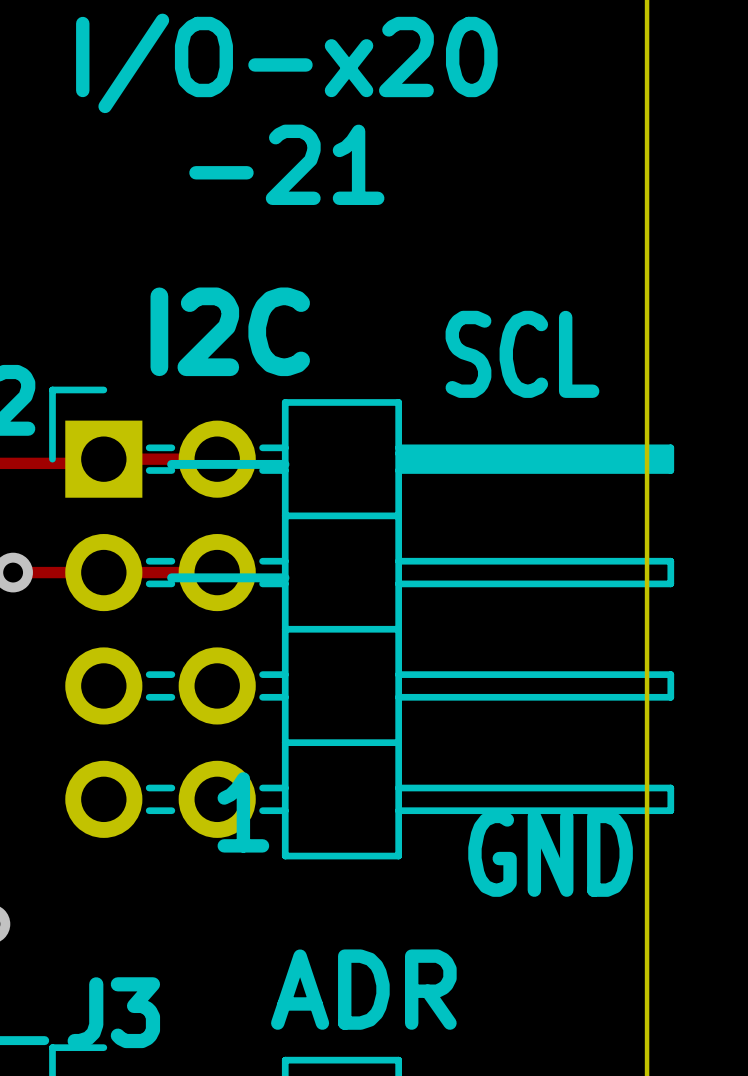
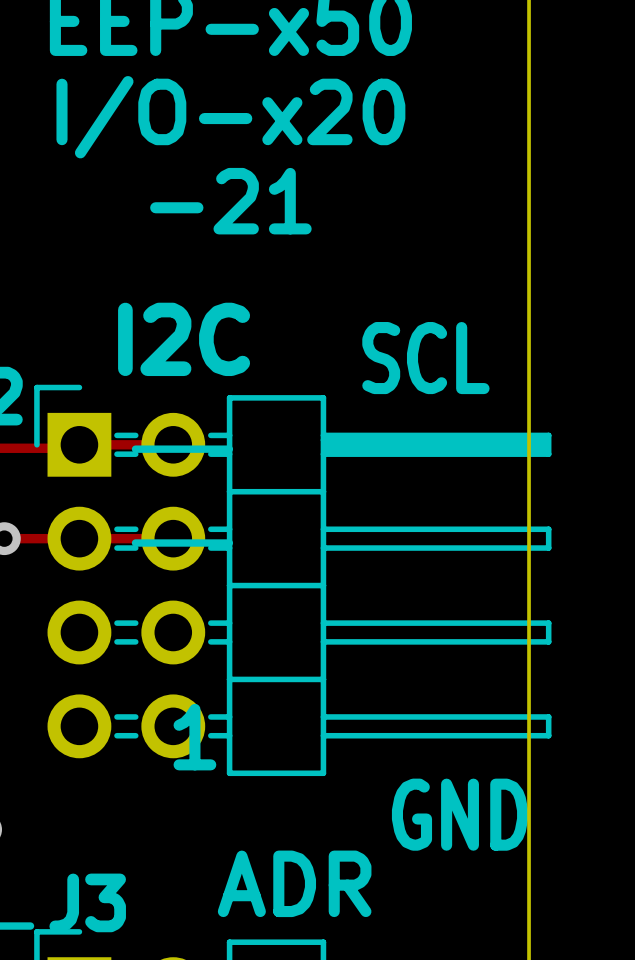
text position: GND (550, 853) -> GND (460, 814)

